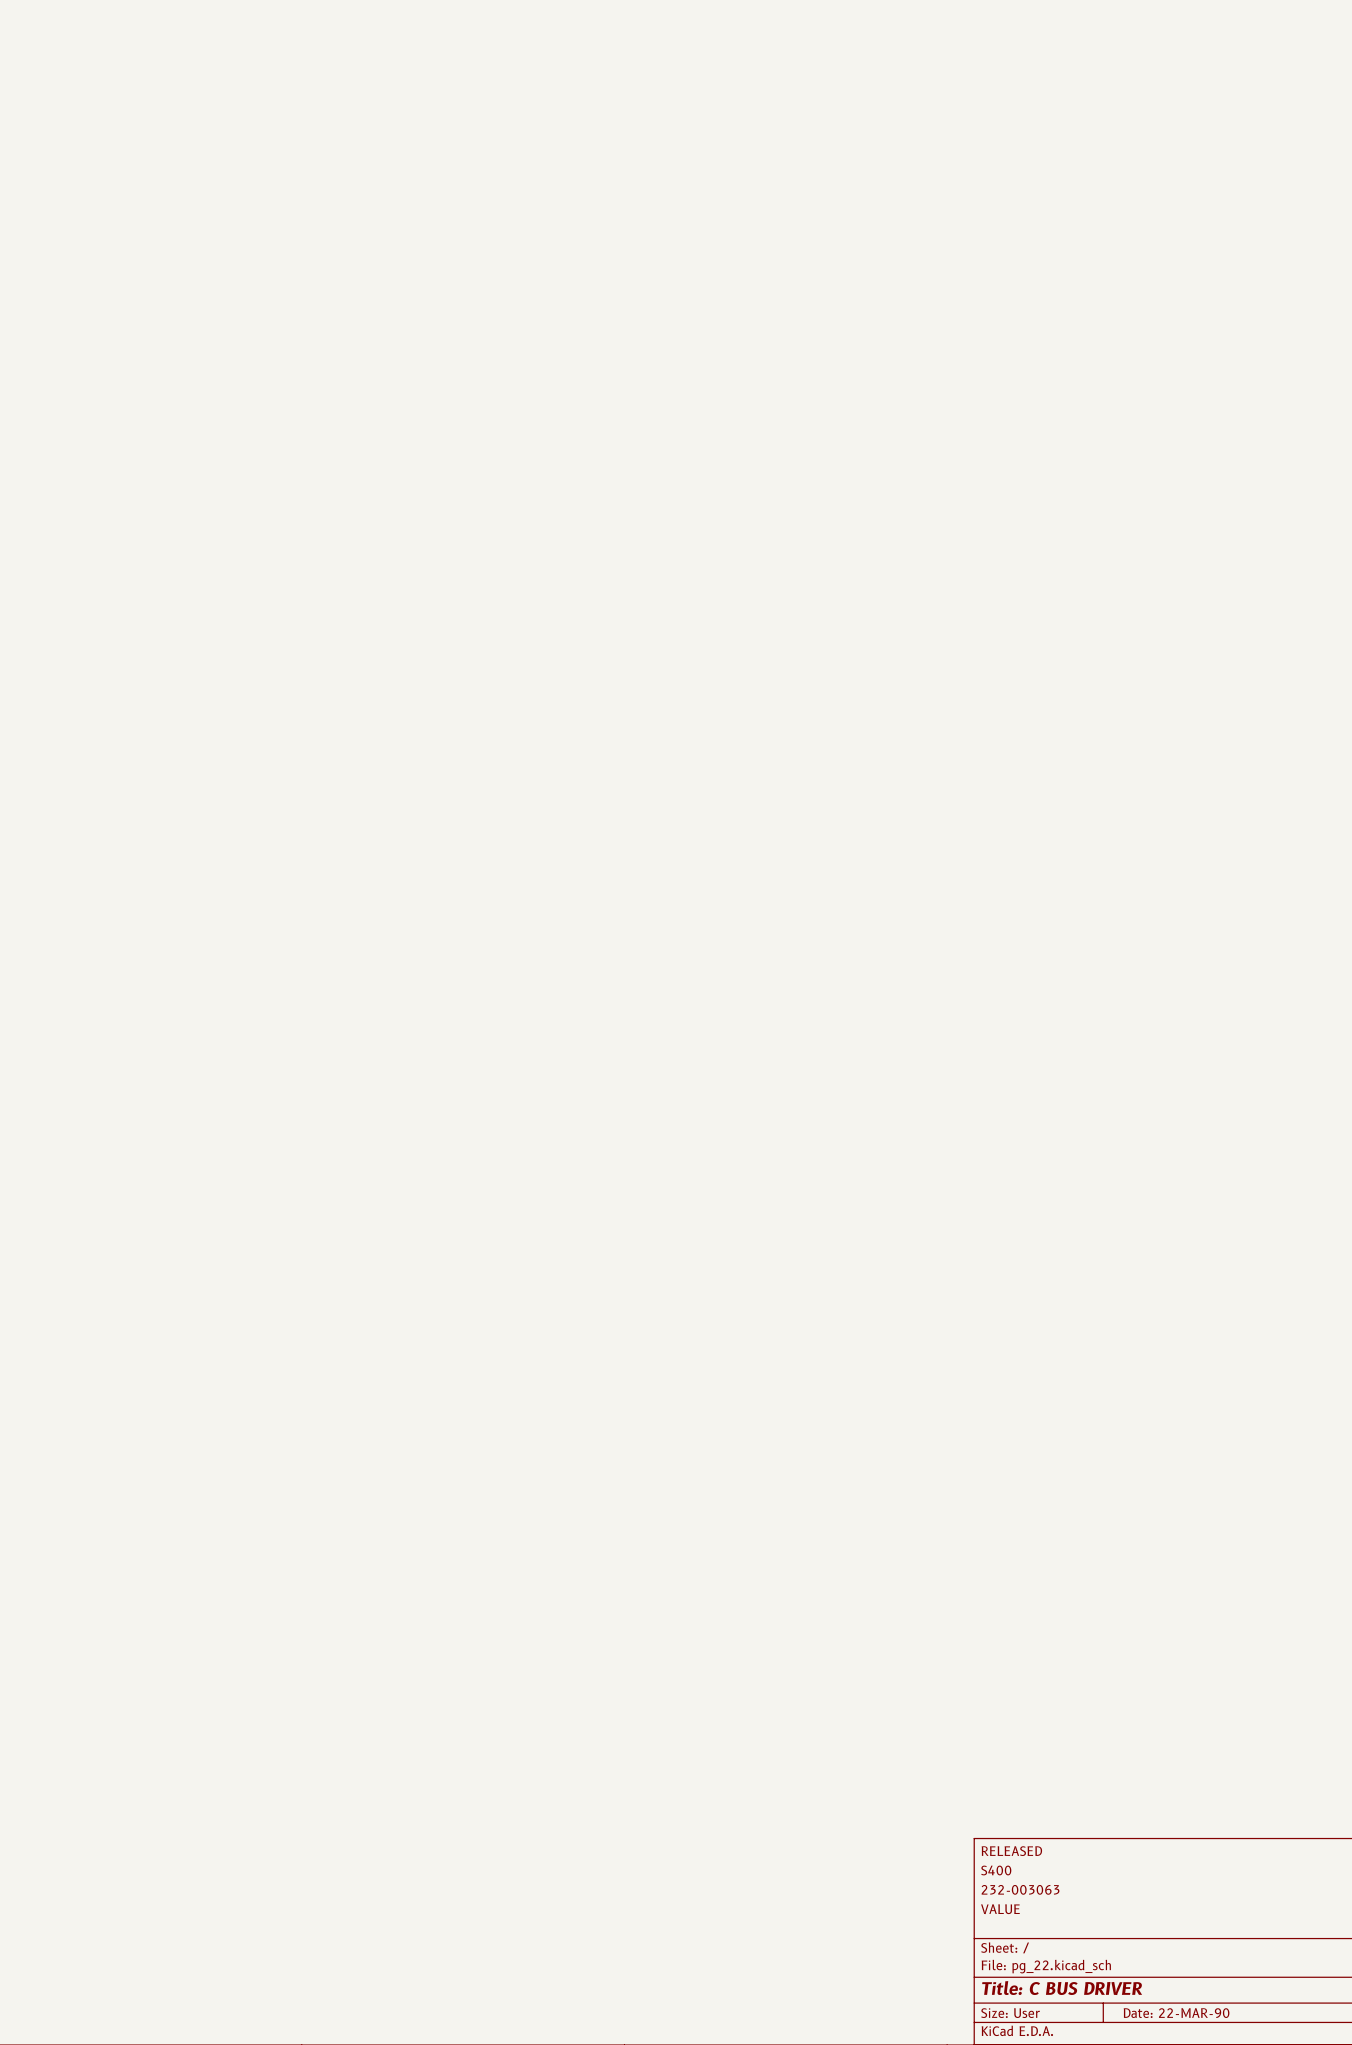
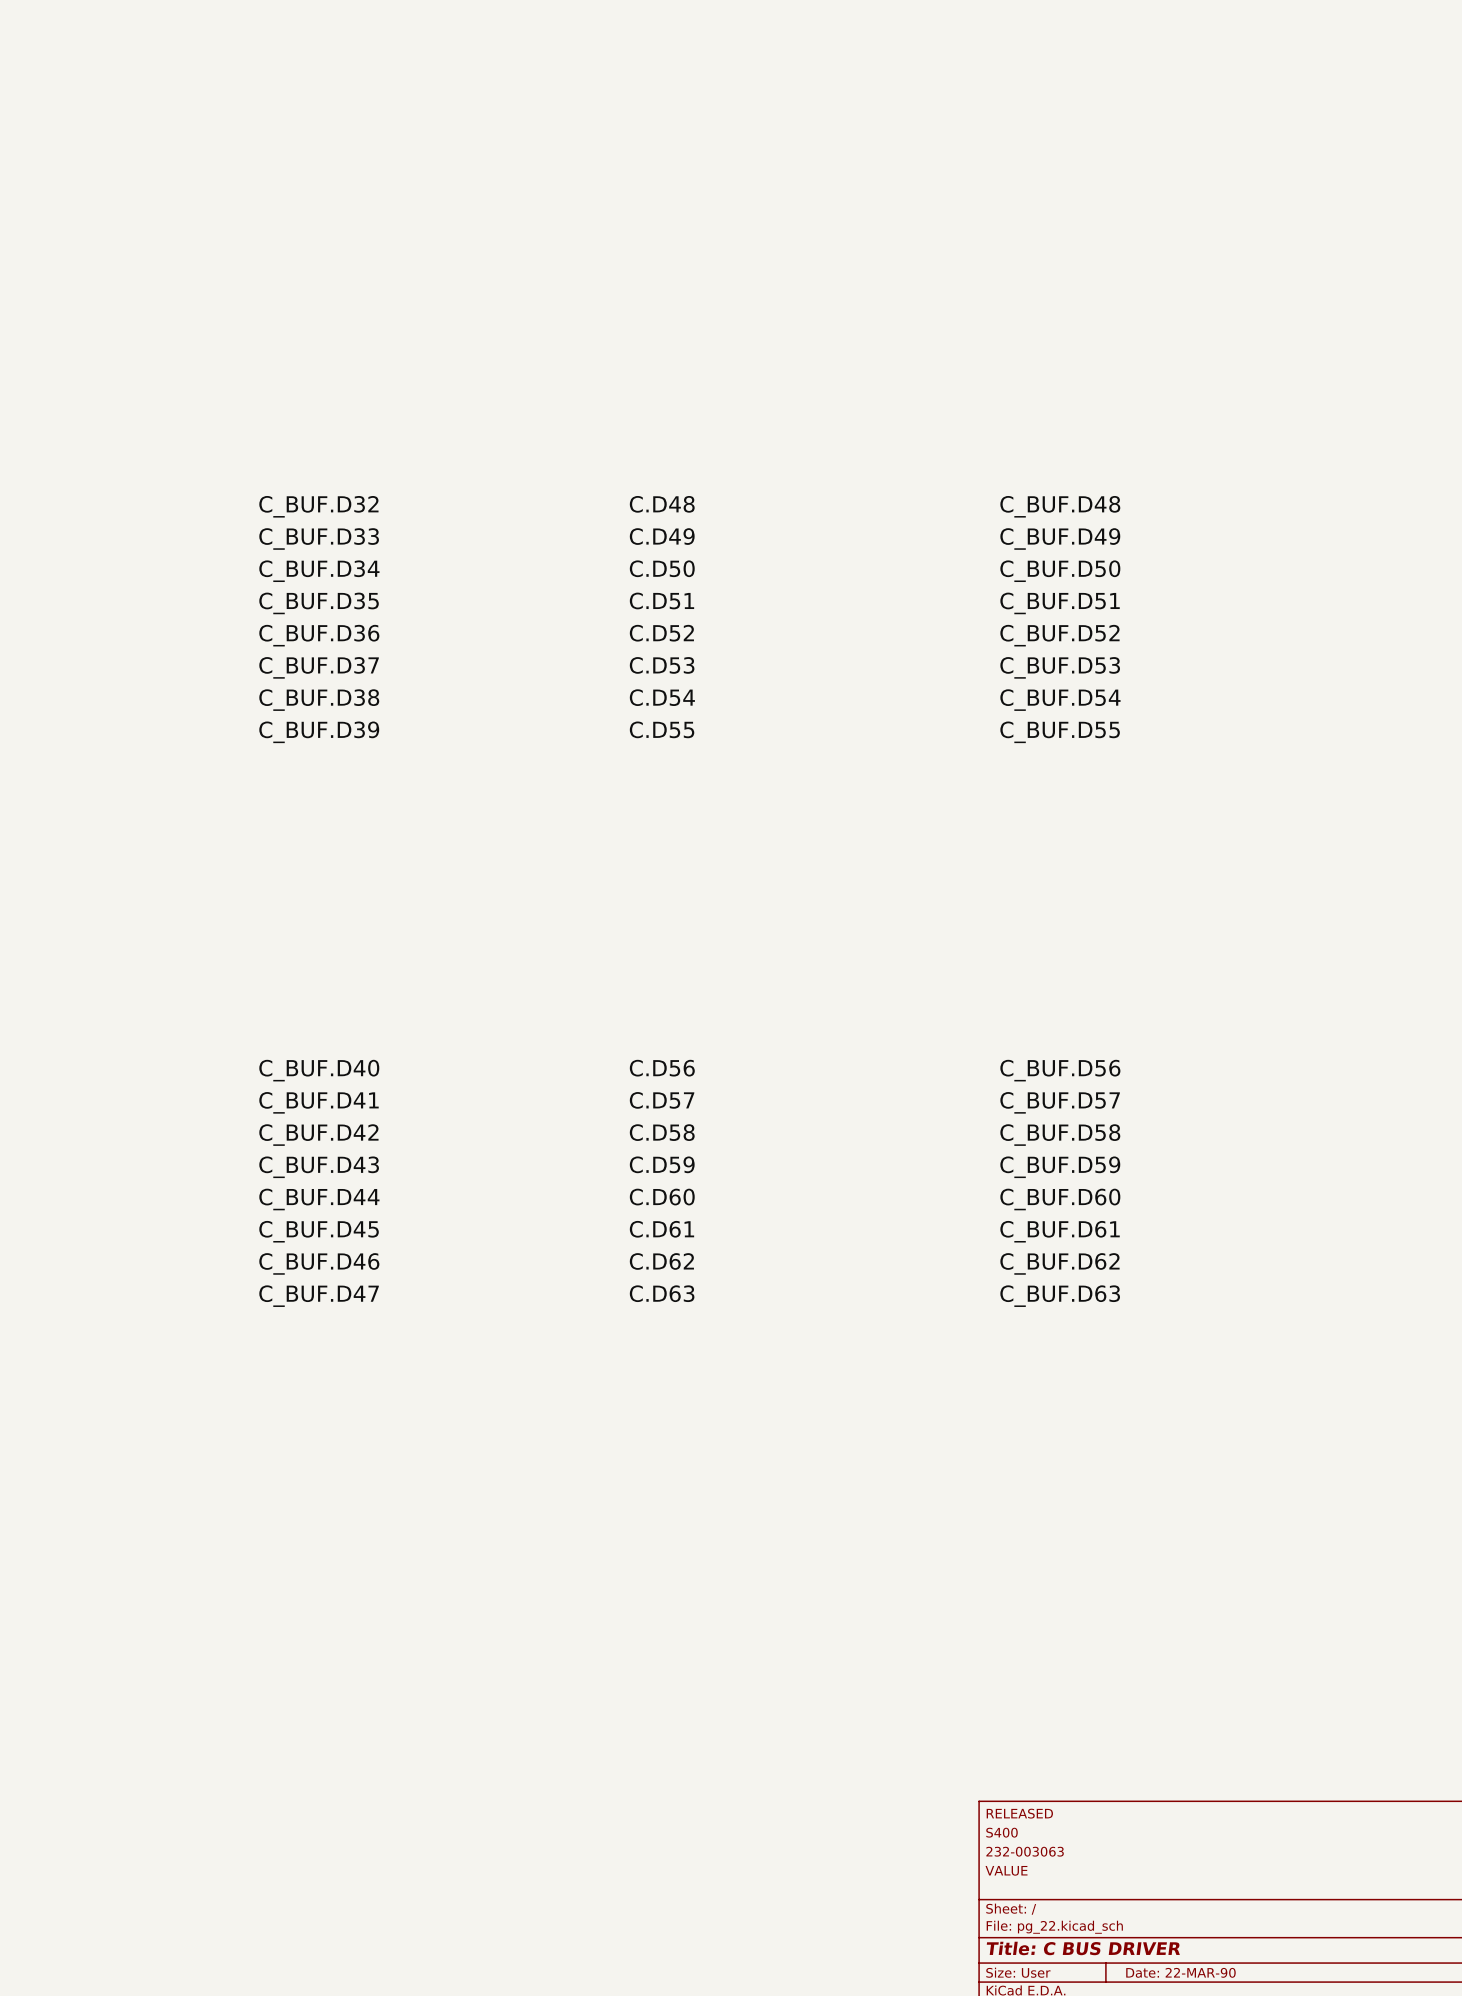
label: none -> C.D48 (662, 504)
label: none -> C_BUF.D32 (318, 506)
label: none -> C_BUF.D48 (1060, 506)
label: none -> C.D49 (662, 536)
label: none -> C_BUF.D33 (319, 538)
label: none -> C_BUF.D49 (1060, 538)
label: none -> C.D50 (662, 568)
label: none -> C_BUF.D34 (319, 571)
label: none -> C_BUF.D50 (1060, 571)
label: none -> C.D51 (661, 600)
label: none -> C_BUF.D35 (319, 603)
label: none -> C_BUF.D51 (1060, 603)
label: none -> C.D52 (661, 633)
label: none -> C_BUF.D36 (319, 635)
label: none -> C_BUF.D52 (1059, 635)
label: none -> C.D53 (662, 665)
label: none -> C_BUF.D37 (319, 667)
label: none -> C_BUF.D53 (1060, 667)
label: none -> C.D54 (662, 697)
label: none -> C_BUF.D38 (319, 700)
label: none -> C_BUF.D54 (1060, 700)
label: none -> C.D55 (662, 729)
label: none -> C_BUF.D39 (319, 732)
label: none -> C_BUF.D55 (1060, 732)
label: none -> C.D56 (662, 1068)
label: none -> C_BUF.D40 (319, 1070)
label: none -> C_BUF.D56 (1060, 1070)
label: none -> C.D57 (662, 1100)
label: none -> C_BUF.D41 (319, 1102)
label: none -> C_BUF.D57 (1060, 1102)
label: none -> C.D58 (662, 1132)
label: none -> C_BUF.D42 (318, 1135)
label: none -> C_BUF.D58 (1060, 1135)
label: none -> C.D59 (662, 1164)
label: none -> C_BUF.D43 (319, 1167)
label: none -> C_BUF.D59 (1060, 1167)
label: none -> C.D60 (662, 1197)
label: none -> C_BUF.D44 (319, 1199)
label: none -> C_BUF.D60 (1060, 1199)
label: none -> C.D61 (661, 1229)
label: none -> C_BUF.D45 (319, 1231)
label: none -> C_BUF.D61 (1060, 1231)
label: none -> C.D62 (661, 1261)
label: none -> C_BUF.D46 (319, 1263)
label: none -> C_BUF.D62 (1059, 1263)
label: none -> C.D63 (662, 1293)
label: none -> C_BUF.D47 (319, 1296)
label: none -> C_BUF.D63 (1060, 1296)

